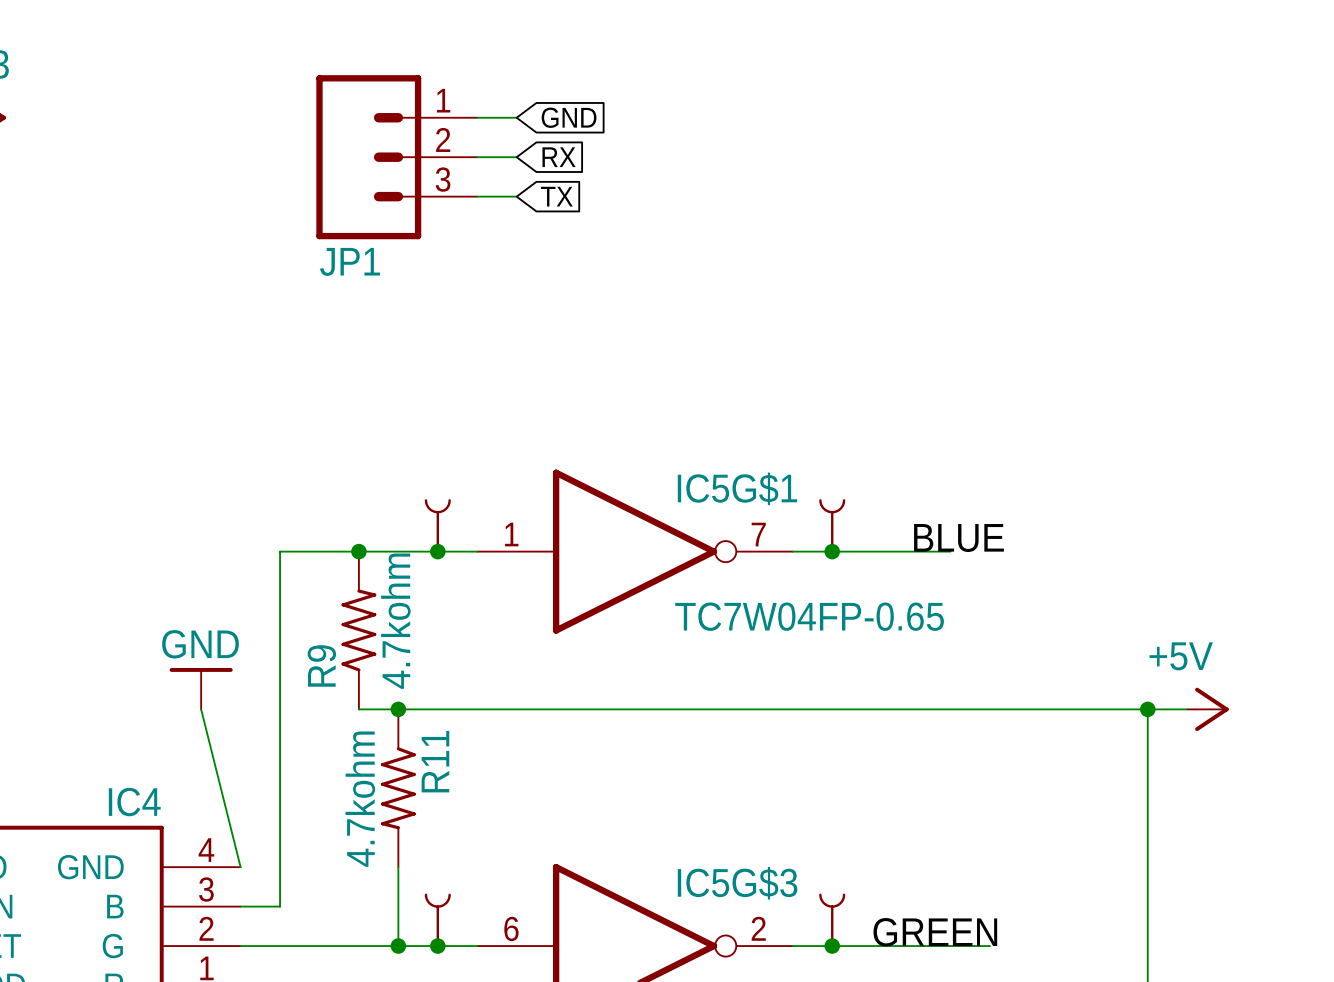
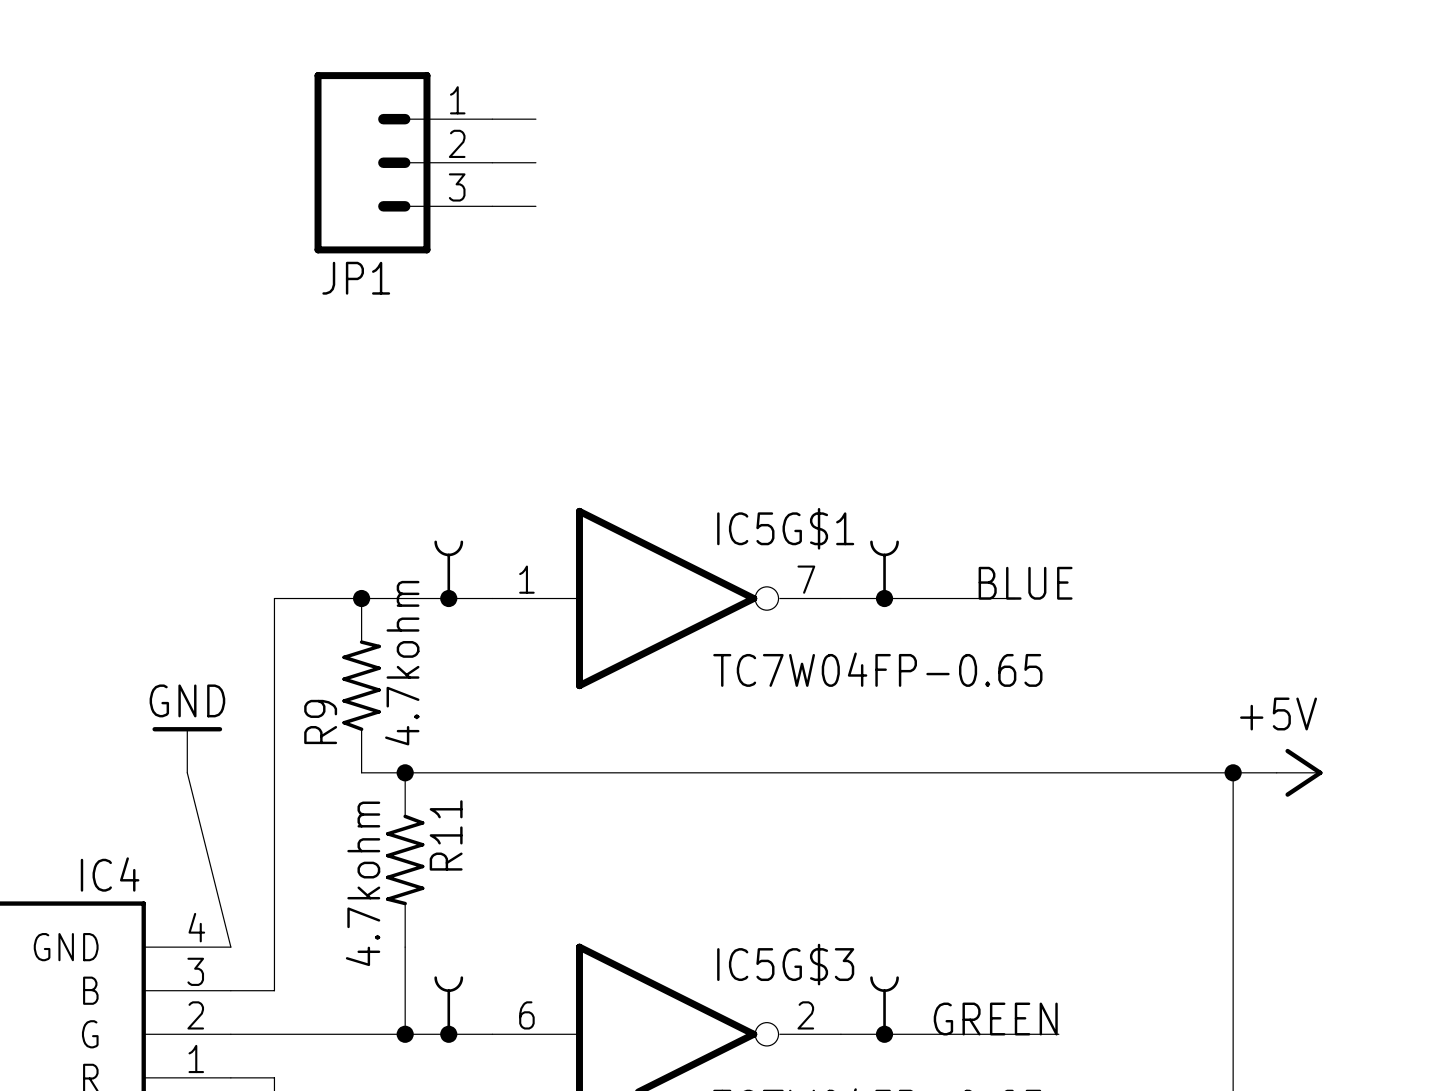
global label: GND (569, 117) -> none
global label: RX (559, 157) -> none
global label: TX (556, 196) -> none

